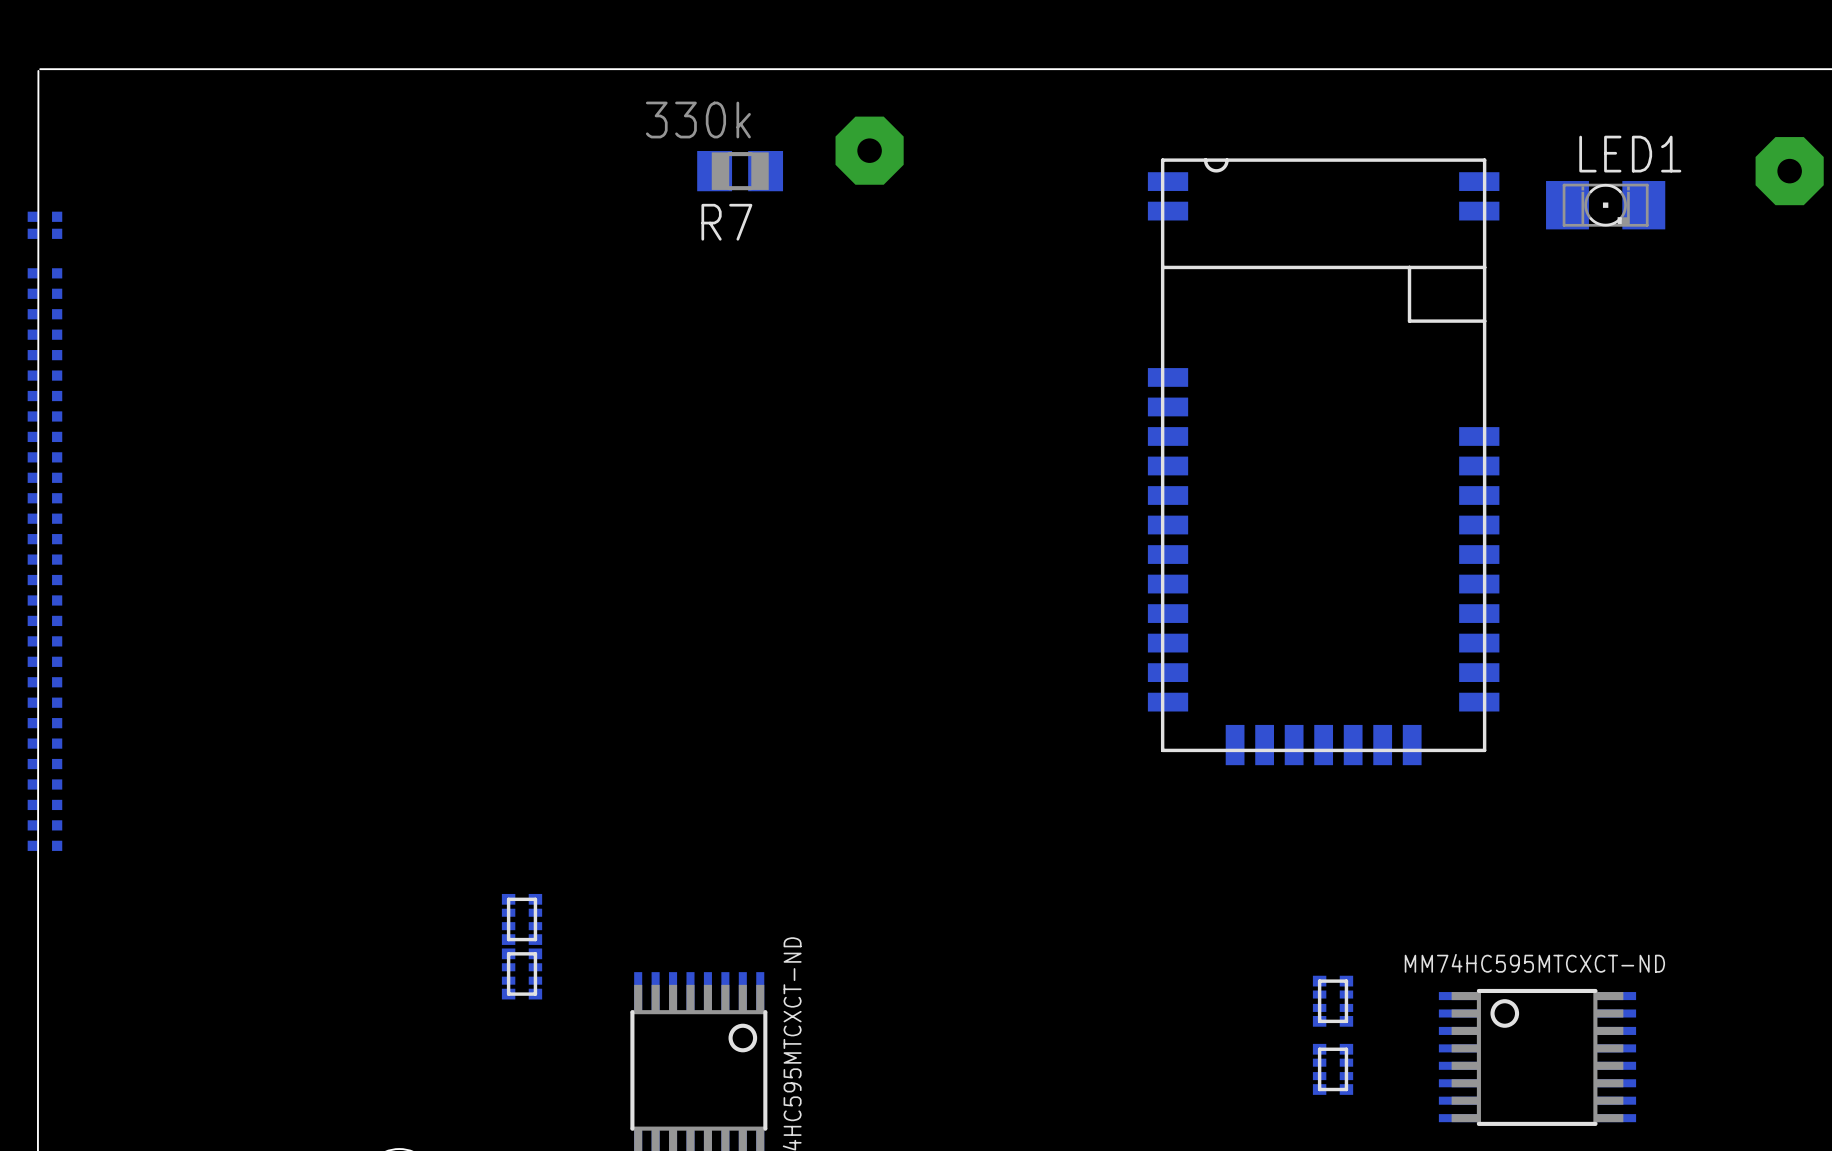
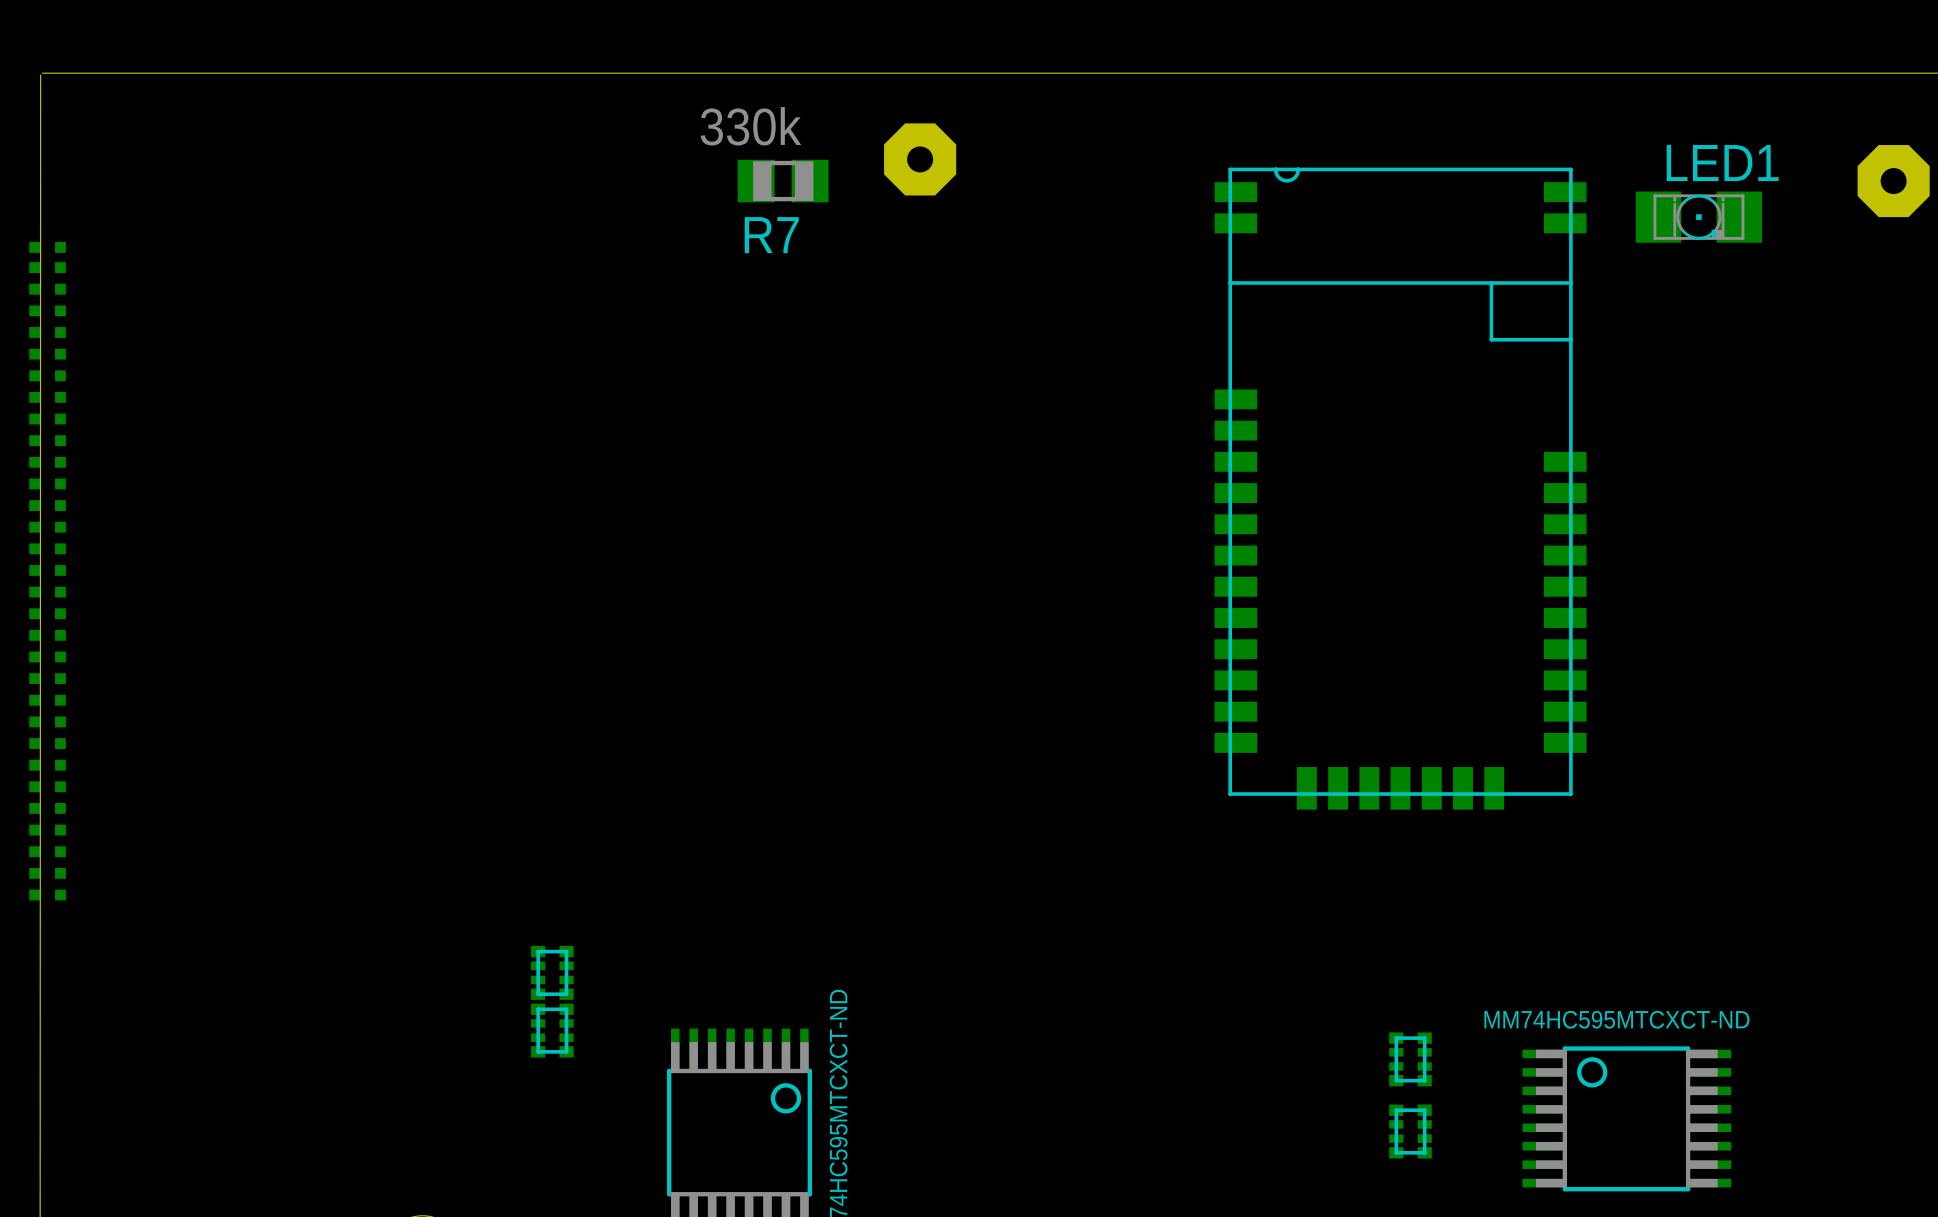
part position: (44, 216) -> (47, 267)

